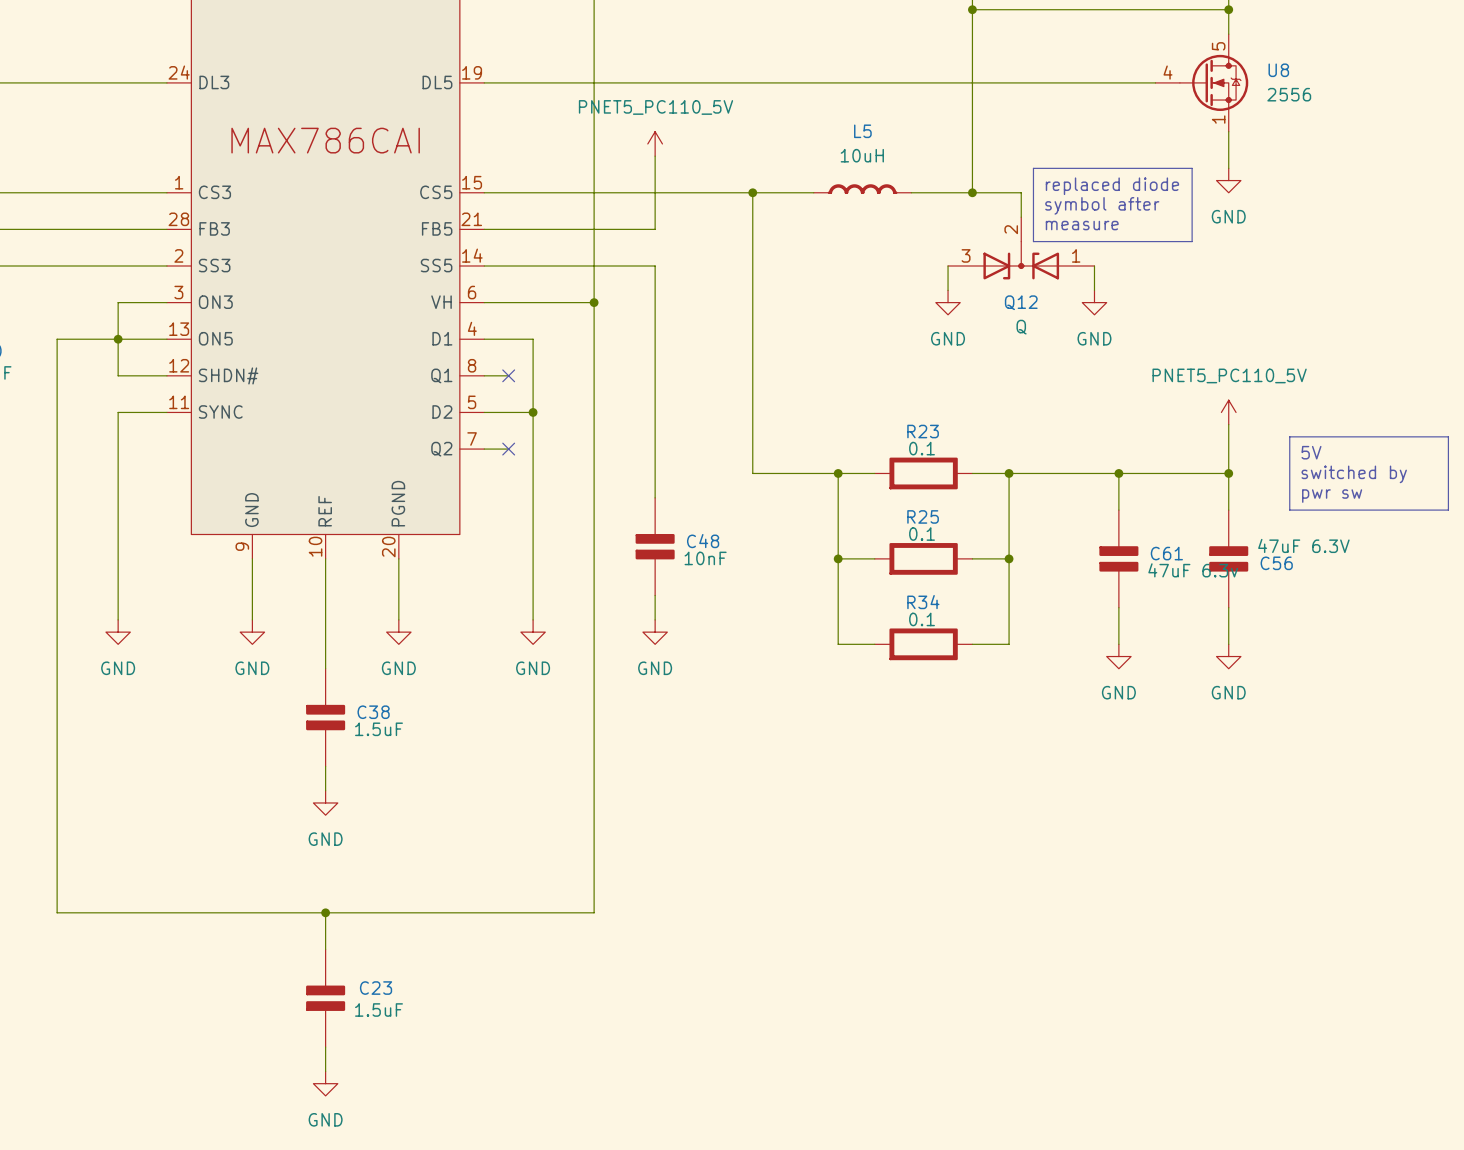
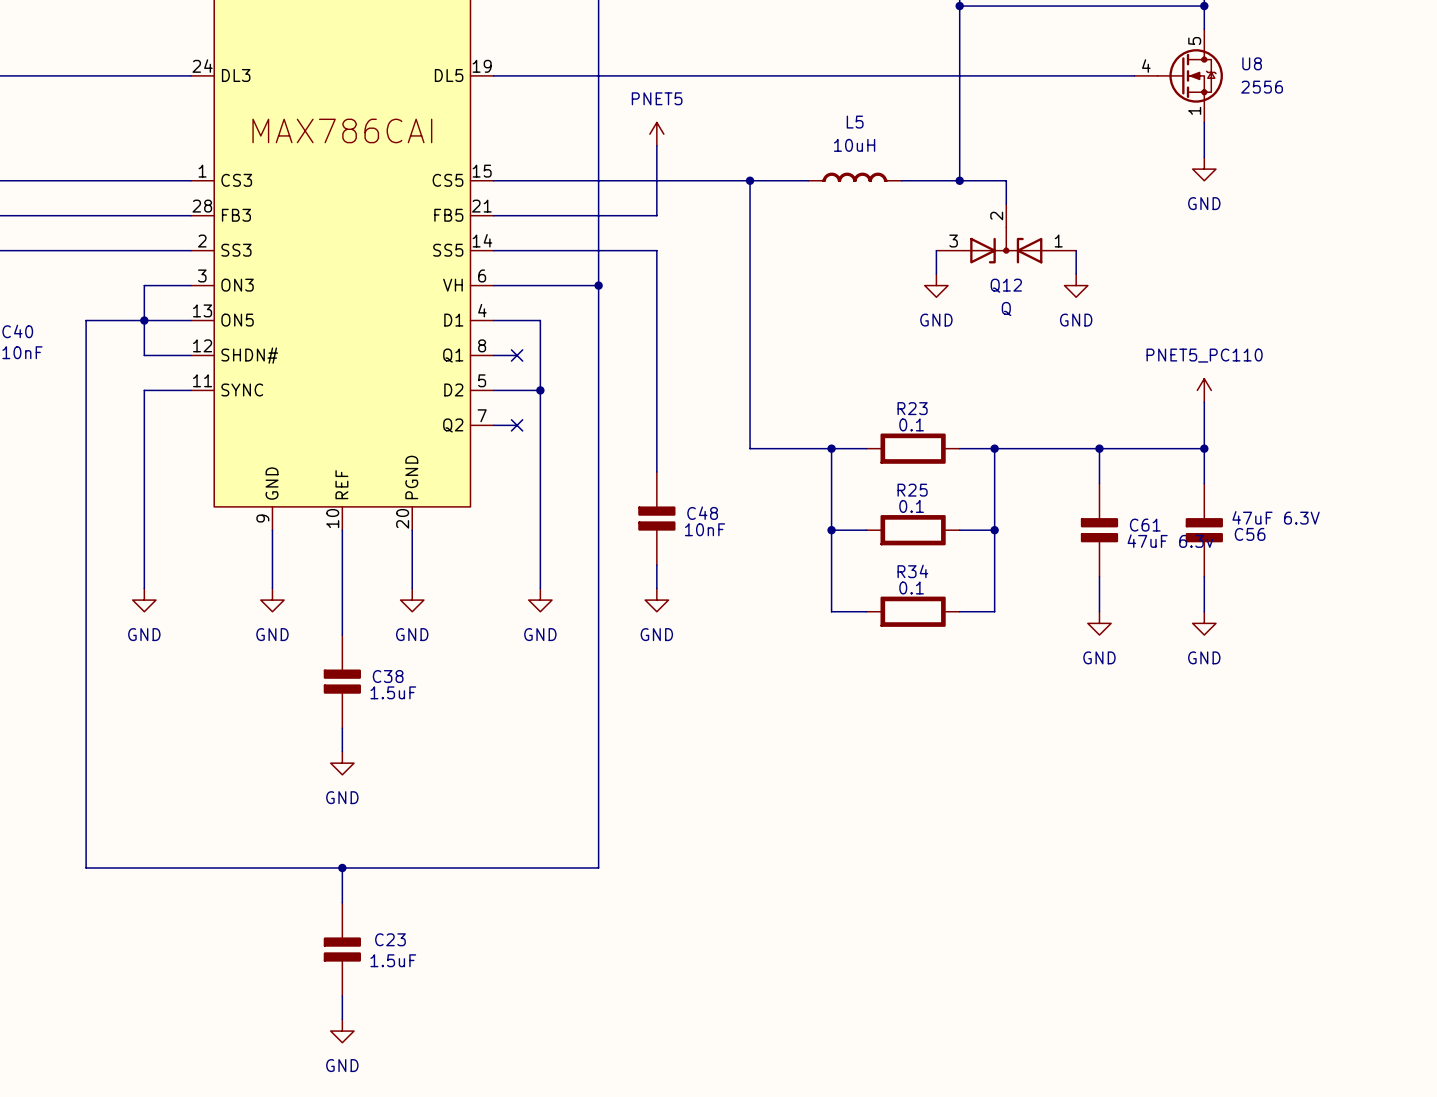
power symbol: PNET5_PC110_5V (655, 143) -> PNET5 (656, 134)
line: (1033, 168) (1192, 168) (1192, 241) (1033, 241) (1033, 168) -> none
text: replaced diode (1112, 186) -> none
text: symbol after (1102, 205) -> none
text: measure (1082, 225) -> none
power symbol: PNET5_PC110_5V (1228, 412) -> PNET5_PC110 (1204, 390)
line: (1289, 436) (1448, 436) (1448, 510) (1289, 510) (1289, 436) -> none
text: 5V (1311, 452) -> none
text: switched by (1354, 474) -> none
text: pwr sw (1332, 496) -> none

